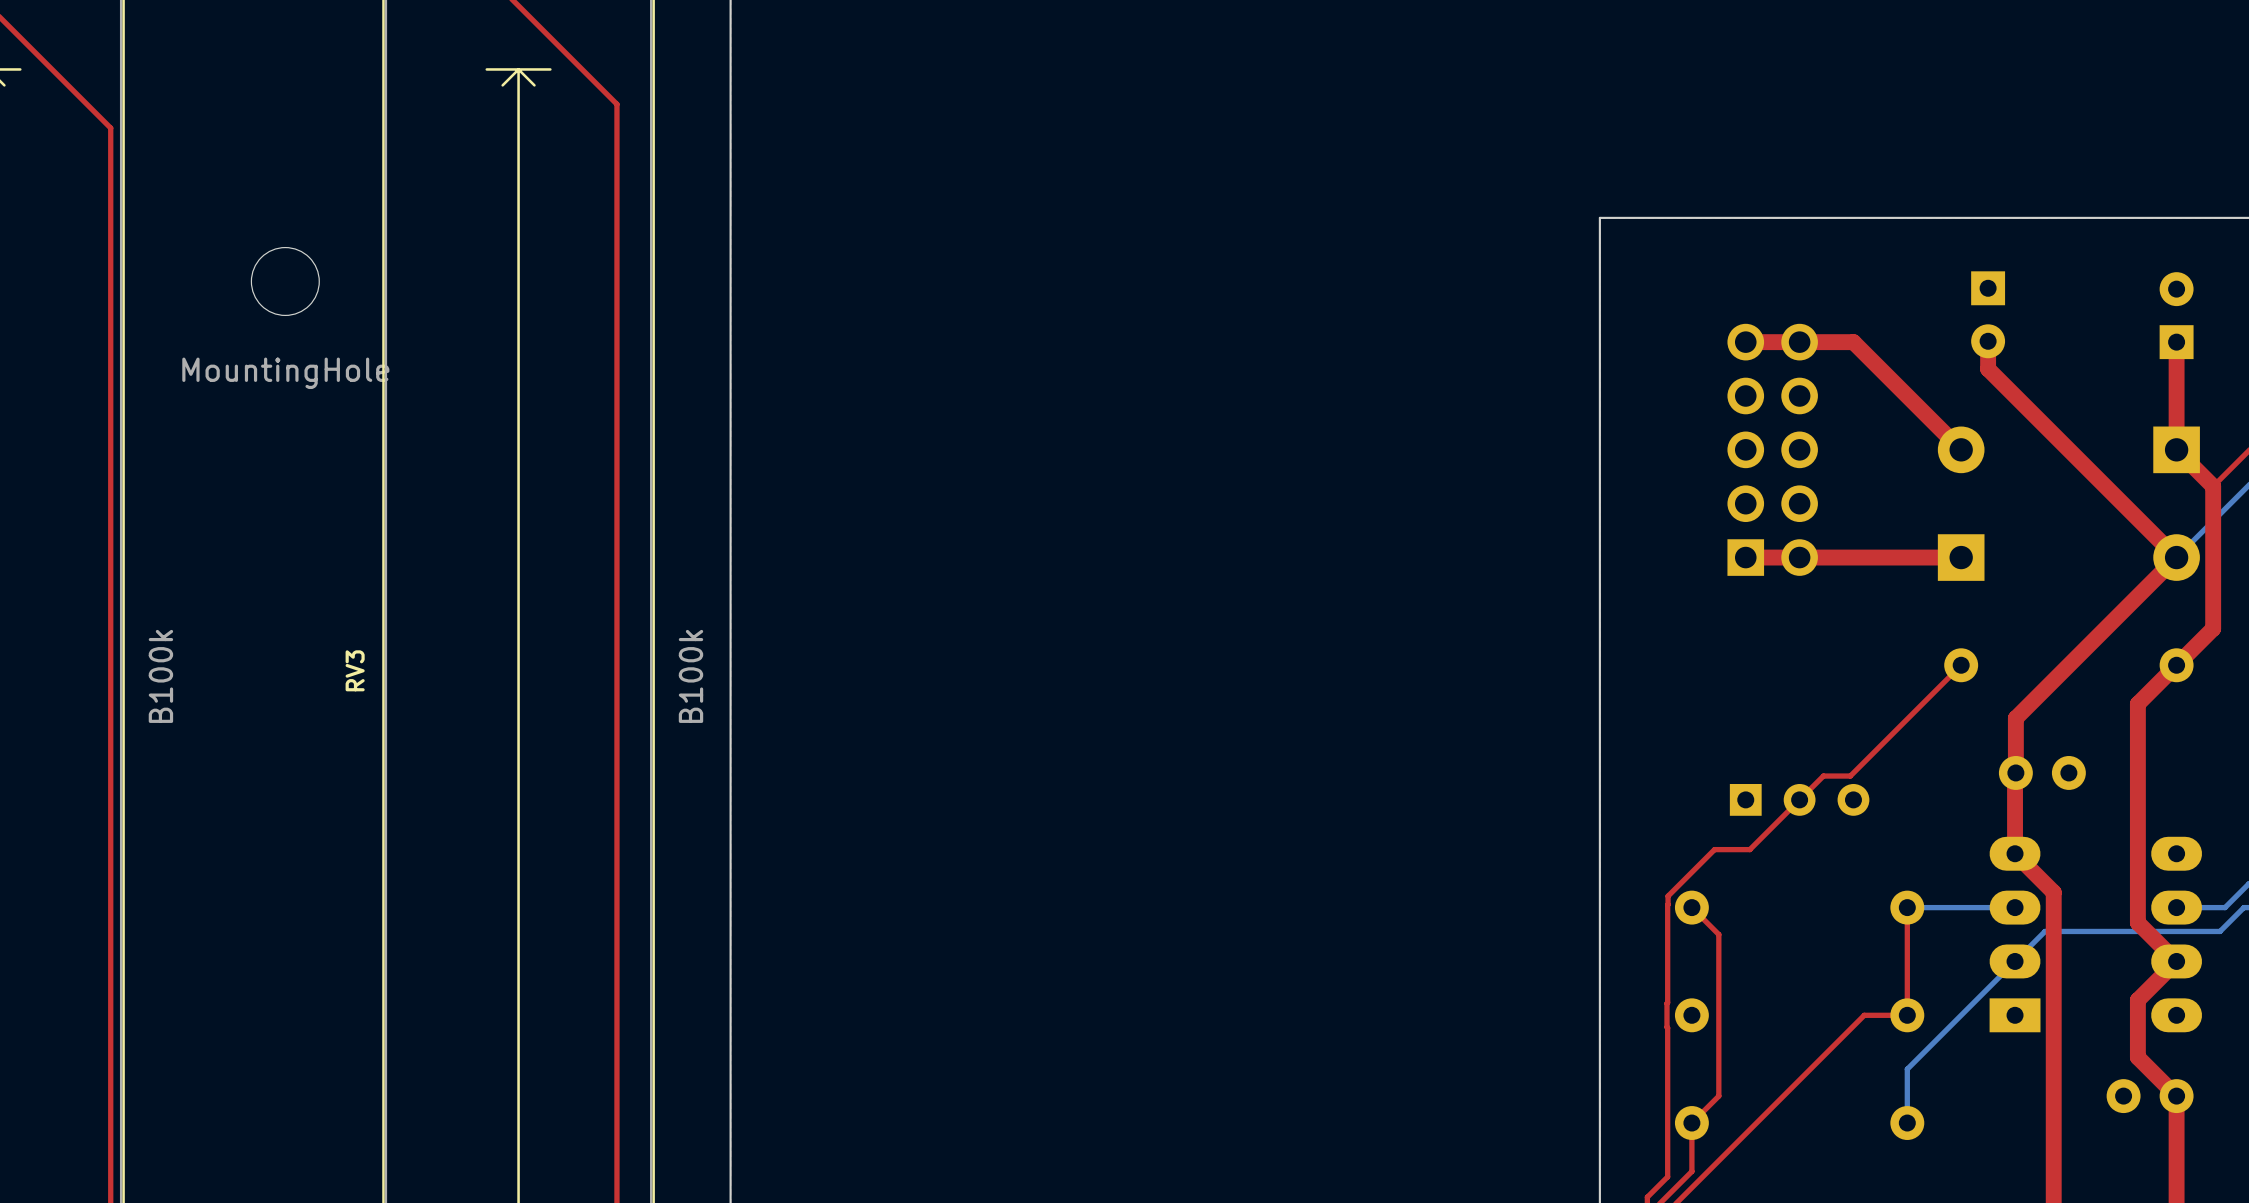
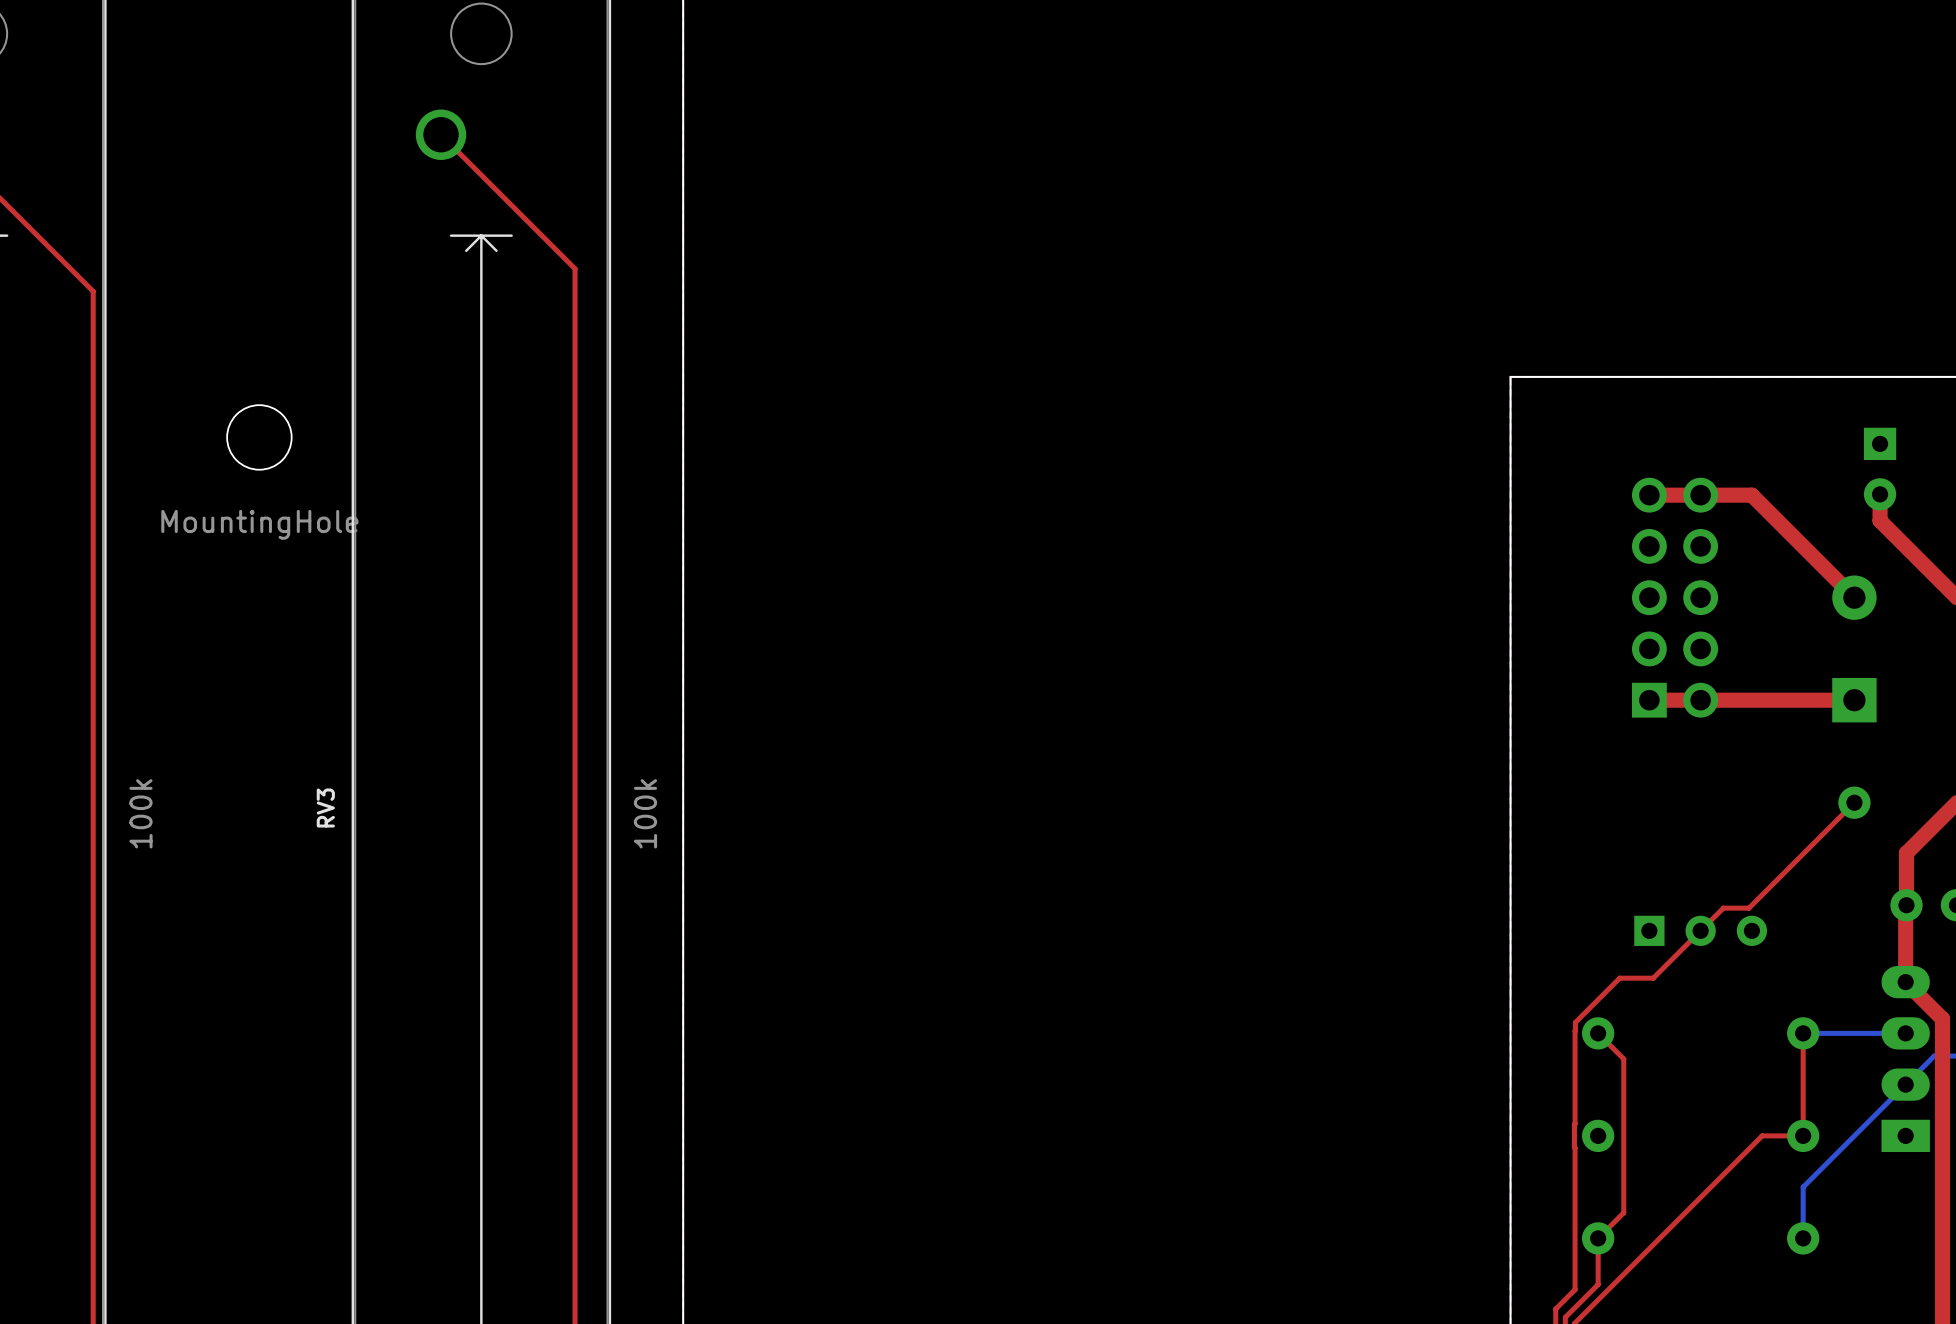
part value: B100k (160, 676) -> 100k (140, 813)
RV3 value: B100k (690, 676) -> 100k (645, 813)

